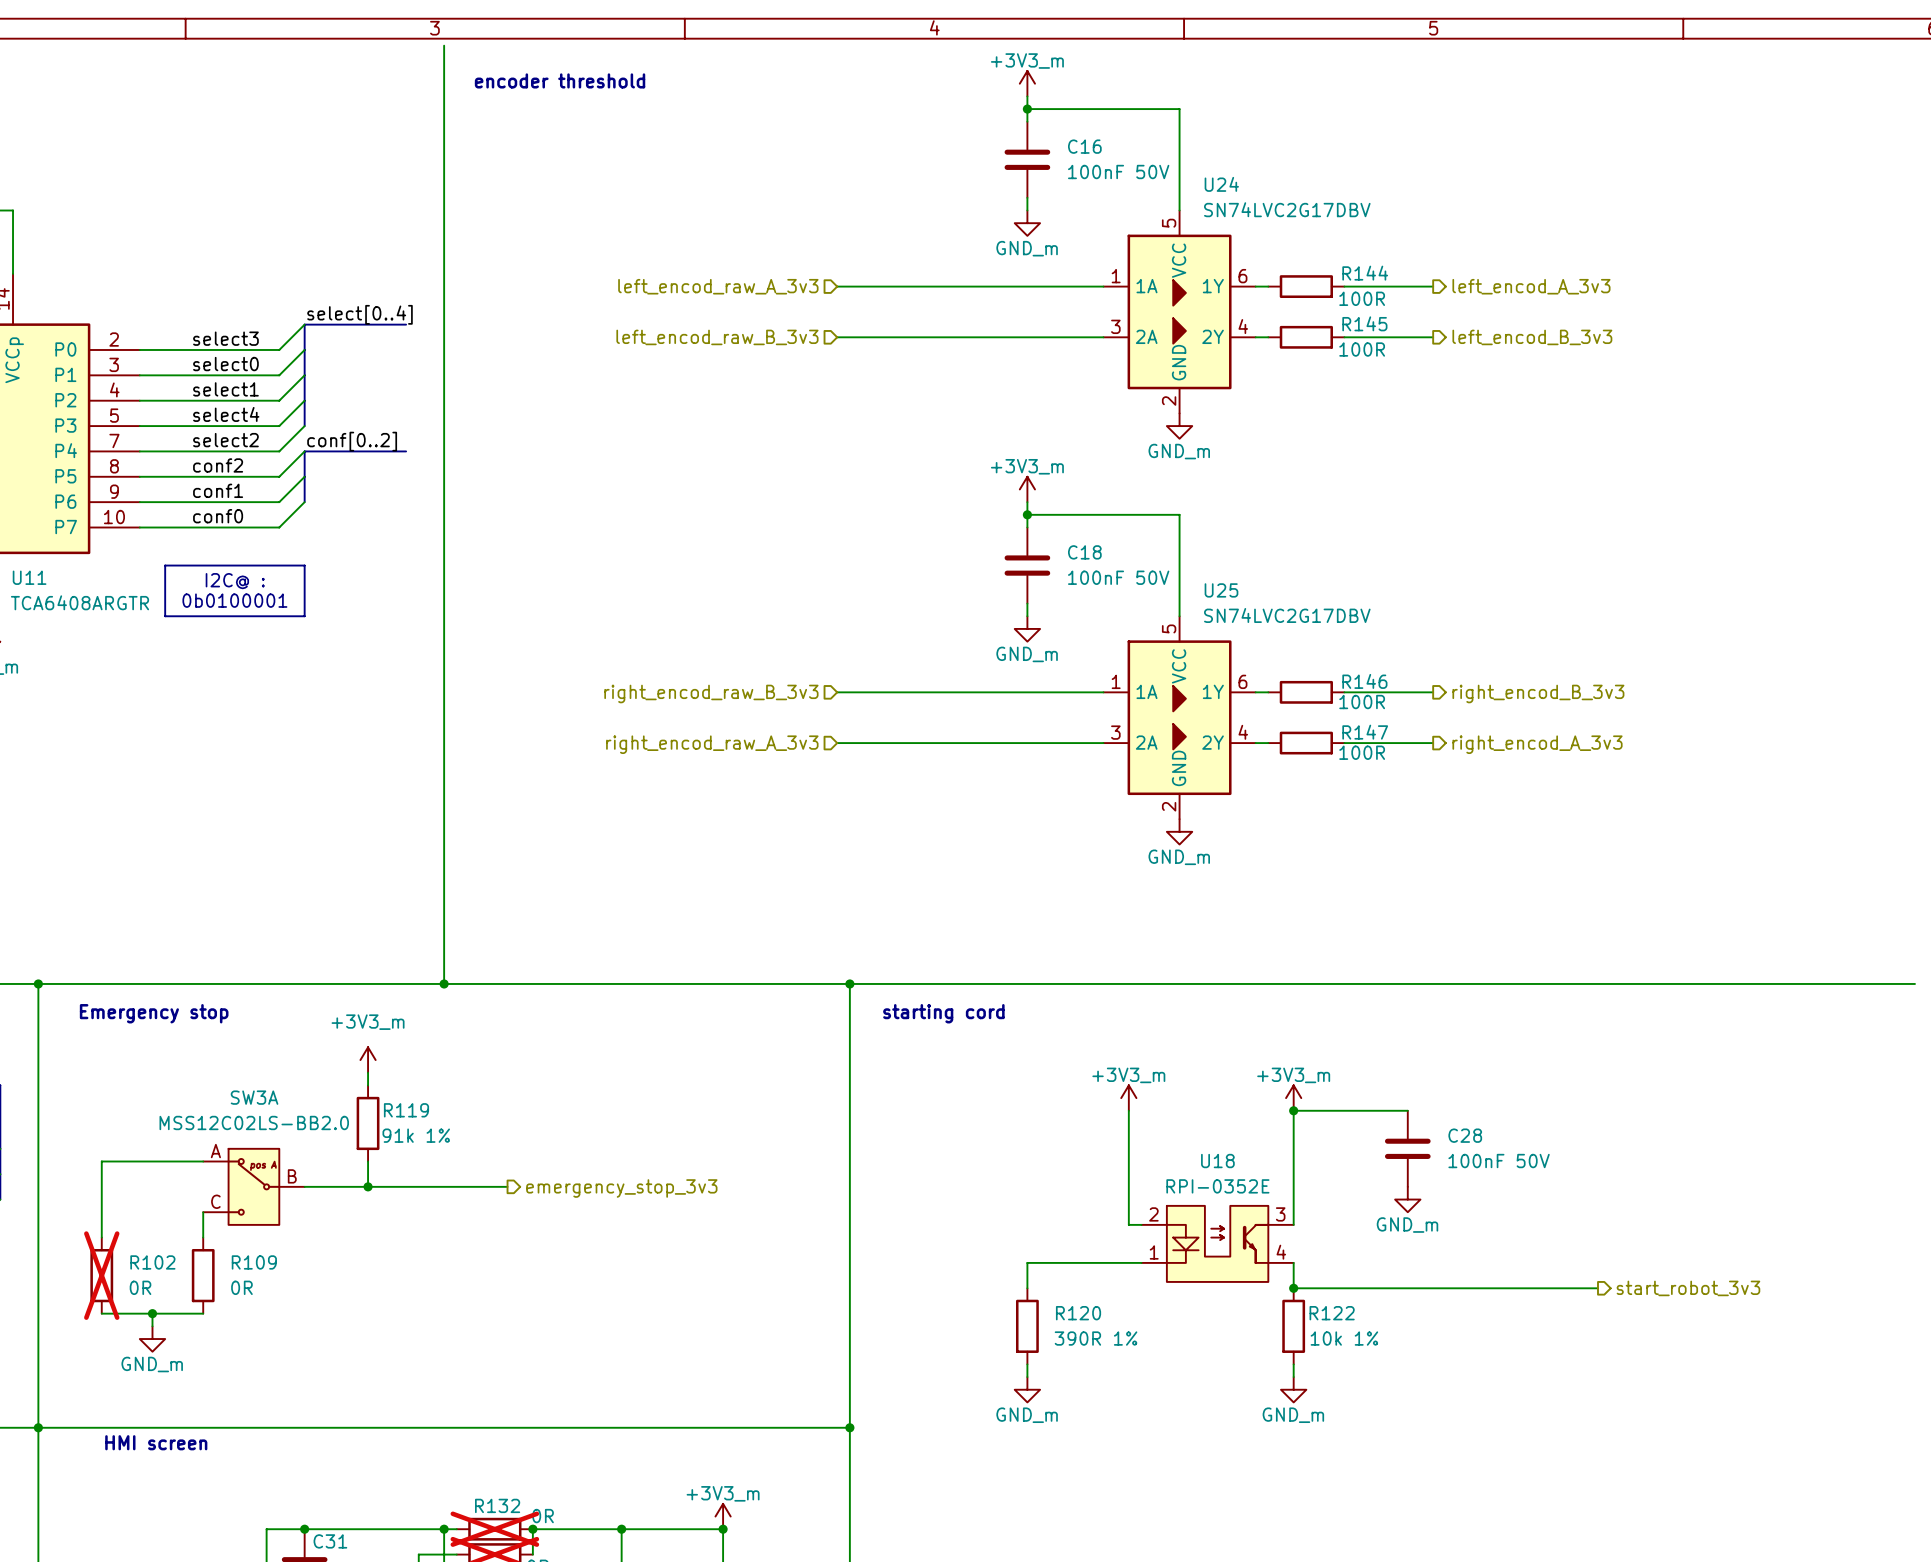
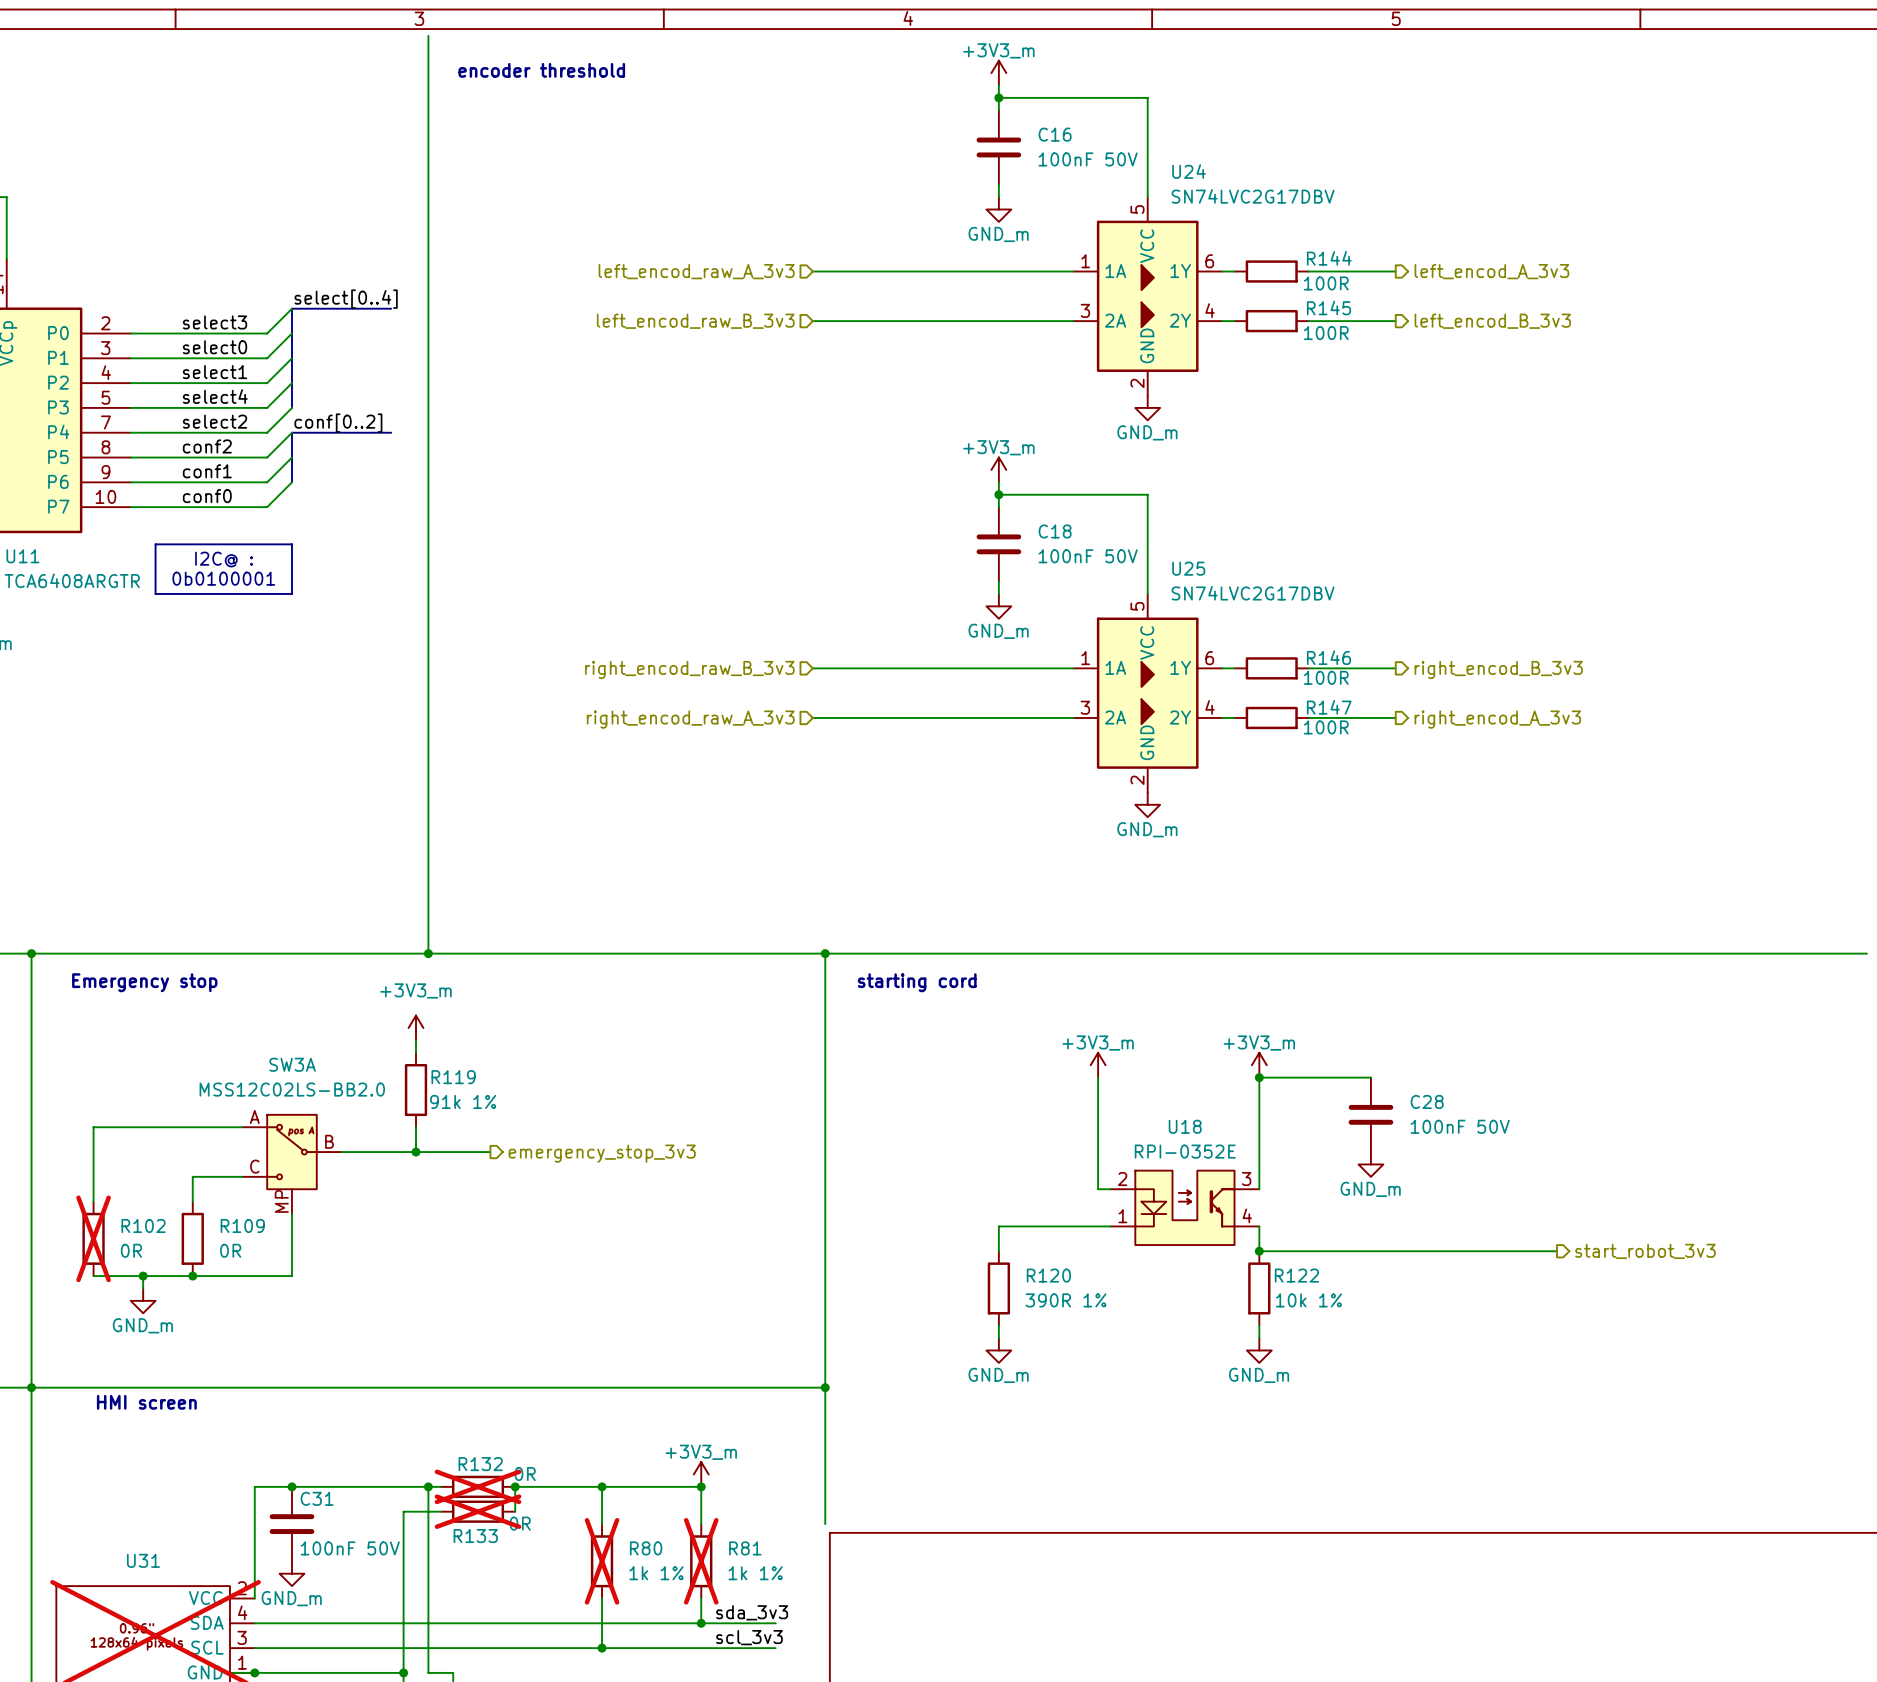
power symbol position: +3V3_m (368, 1060) -> +3V3_m (416, 1028)
wire: (368, 1072) (368, 1085) -> (416, 1040) (416, 1052)
R119 position: (368, 1123) -> (416, 1090)
SW3A symbol: [203, 1148, 305, 1225] -> [242, 1114, 342, 1215]
wire: (368, 1161) (368, 1186) -> (416, 1127) (416, 1152)
junction: (368, 1186) -> none
junction: none -> (416, 1152)
wire: none -> (291, 1214) (291, 1276) (192, 1276)
junction: none -> (192, 1276)

